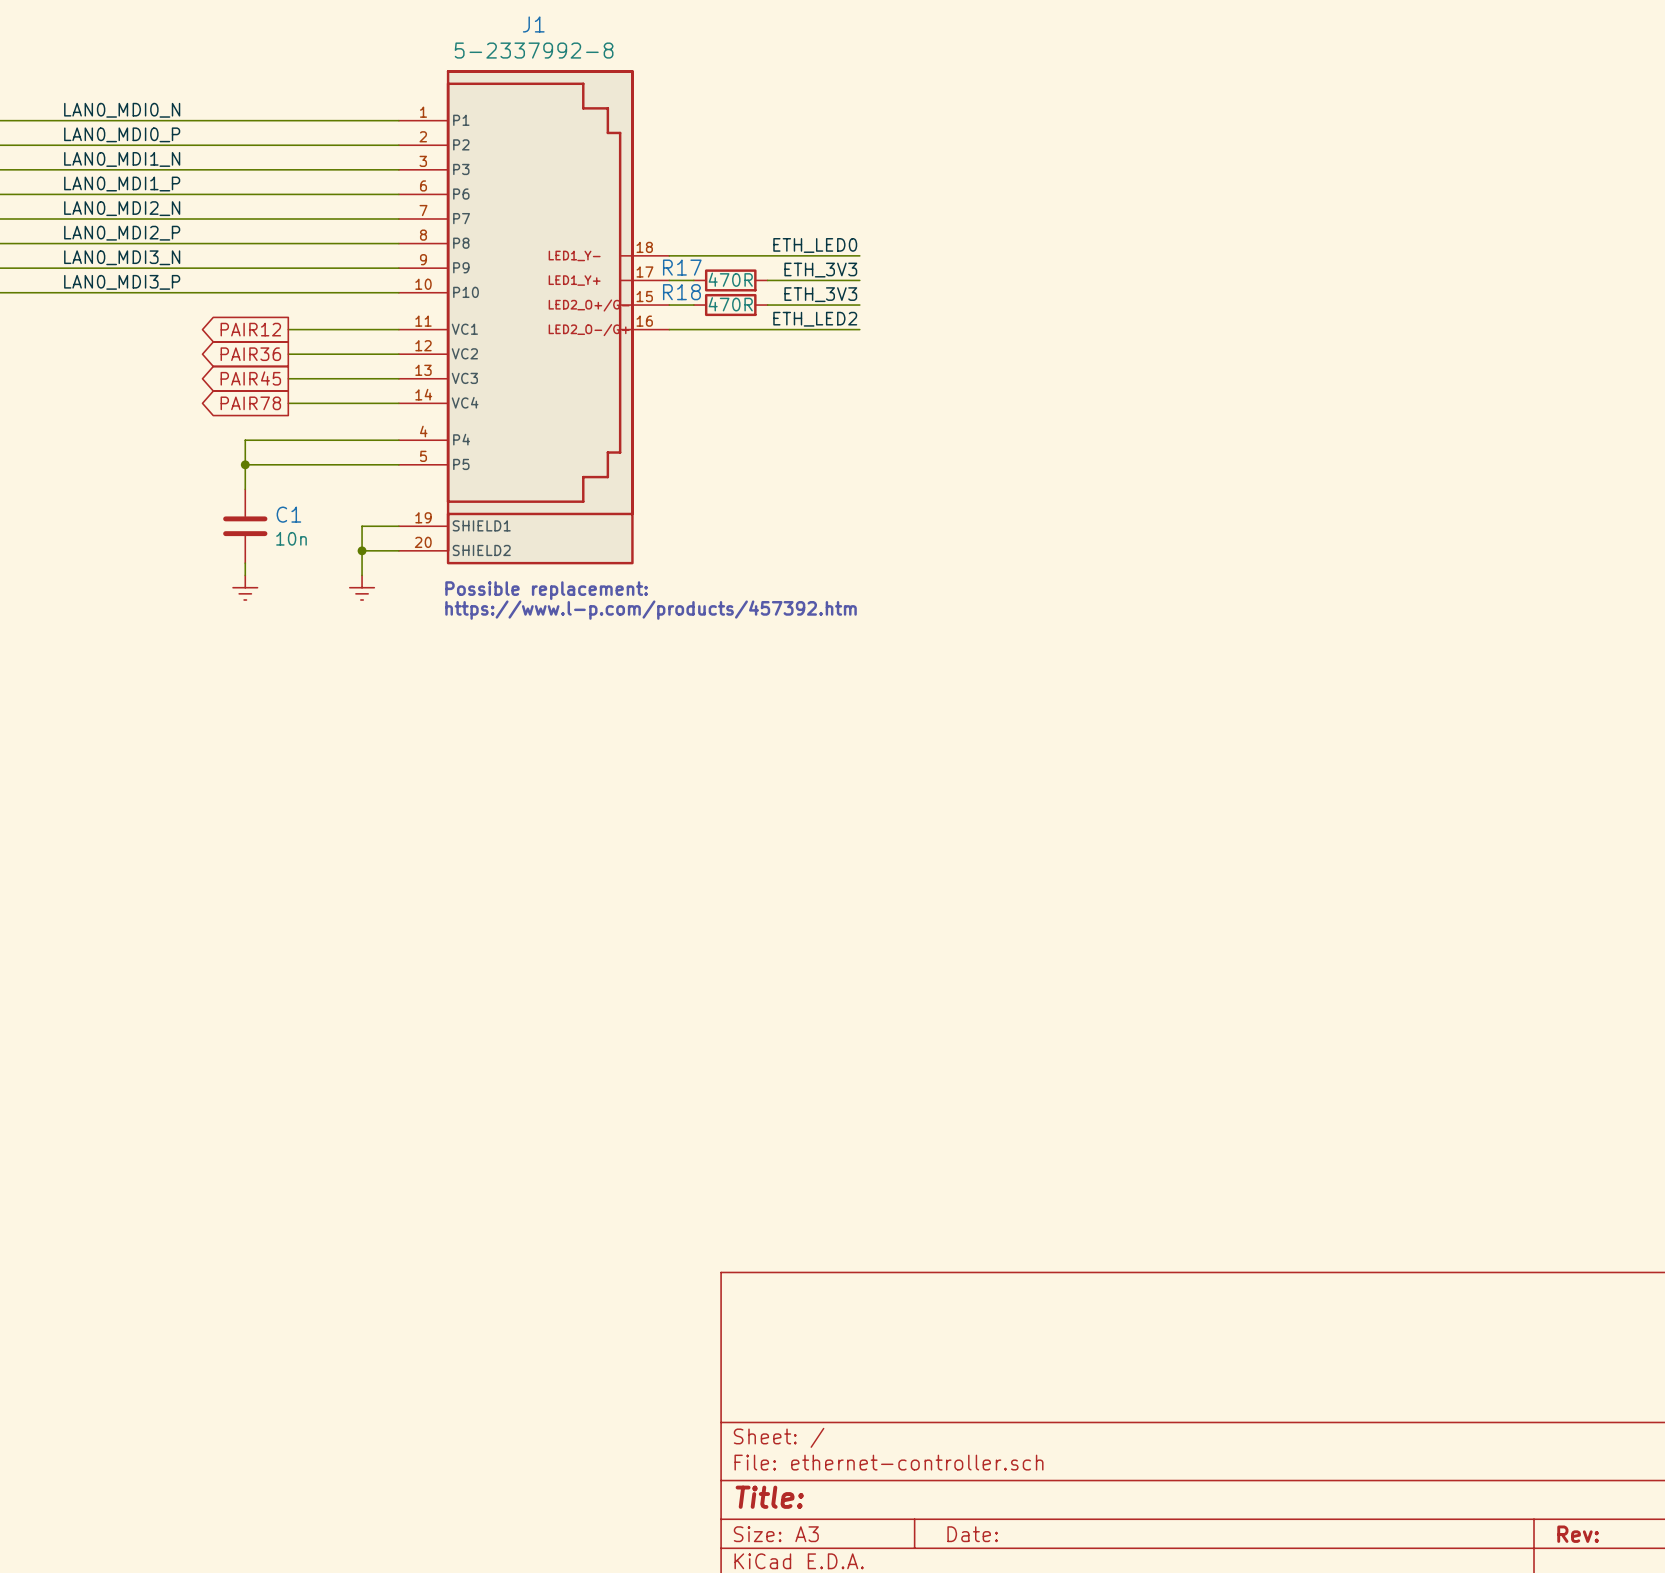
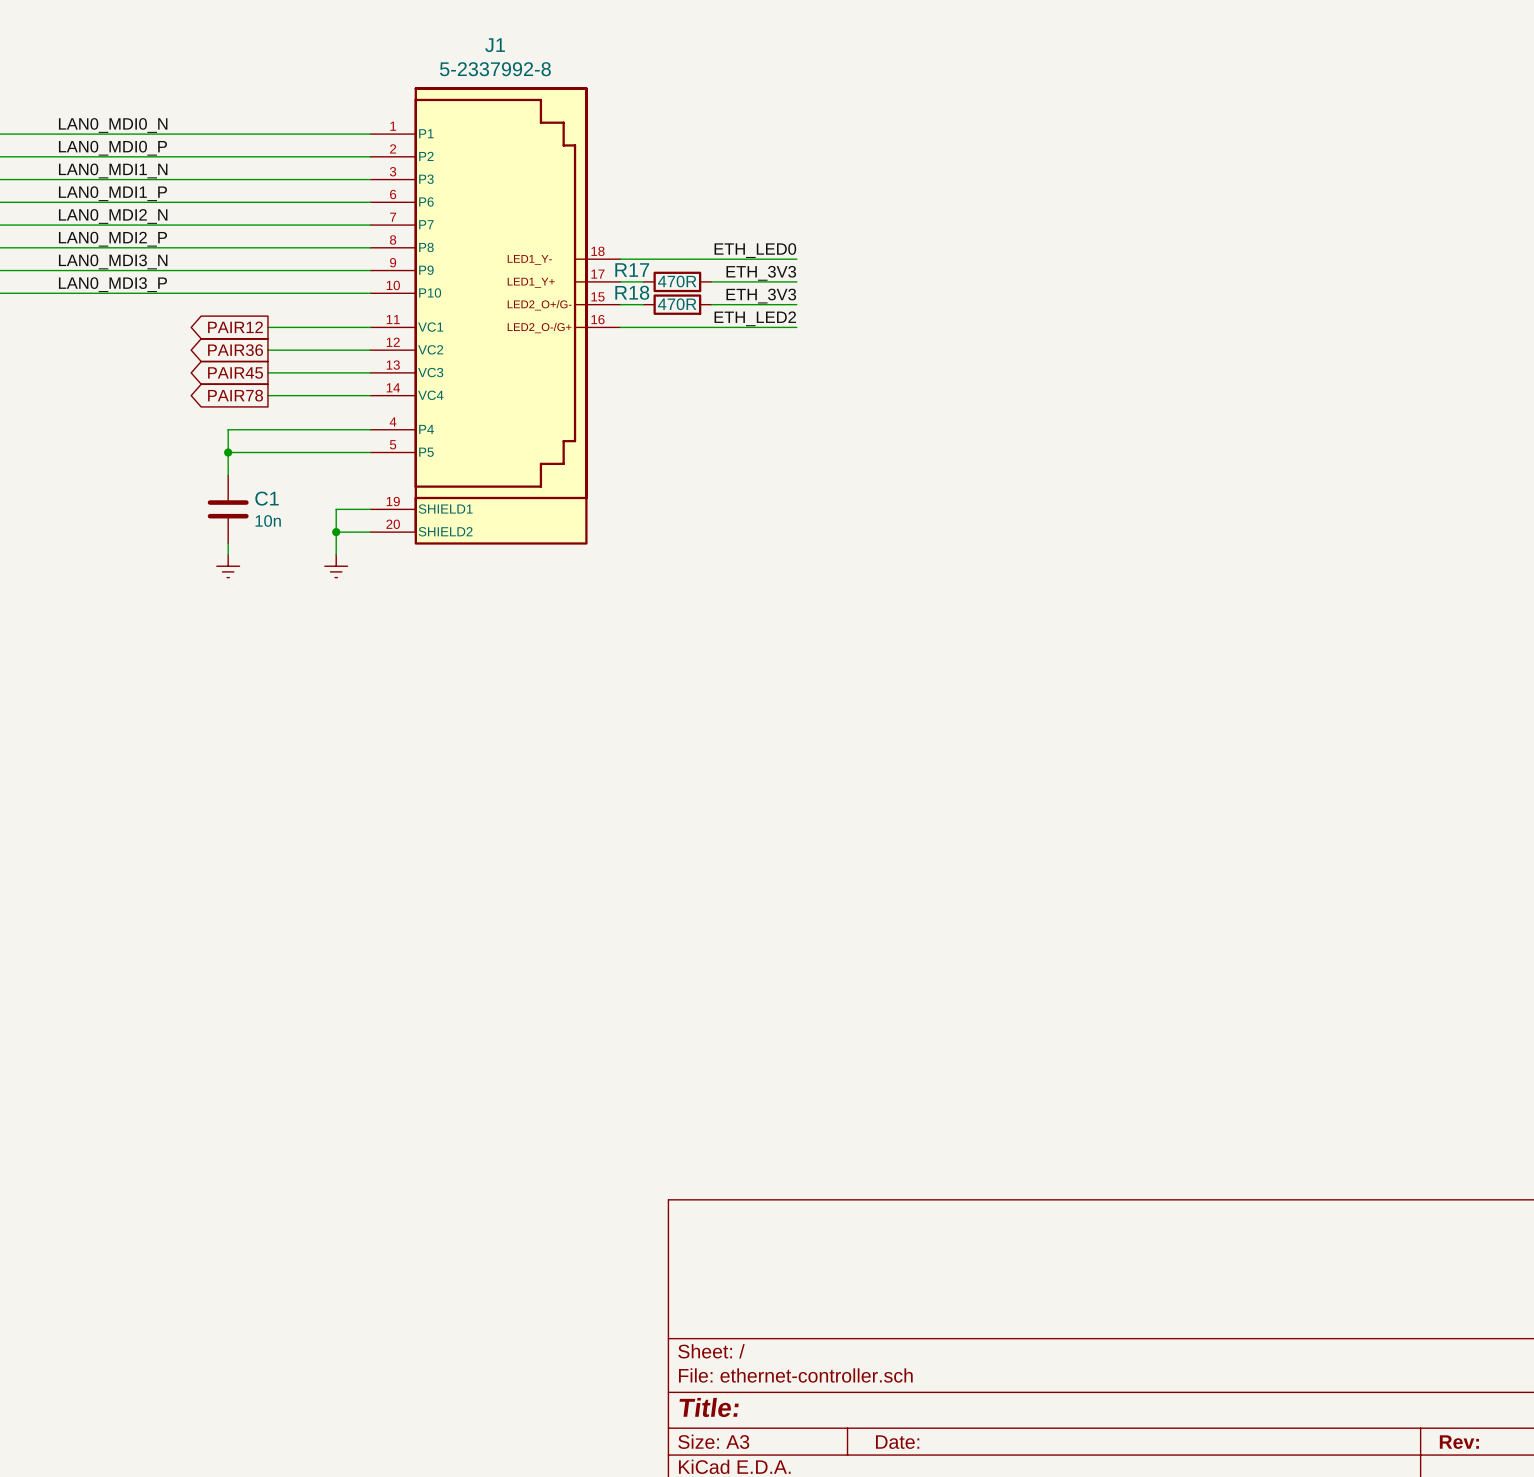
text: Possible replacement: (546, 590) -> none
text: https://www.l-p.com/products/457392.htm (651, 610) -> none

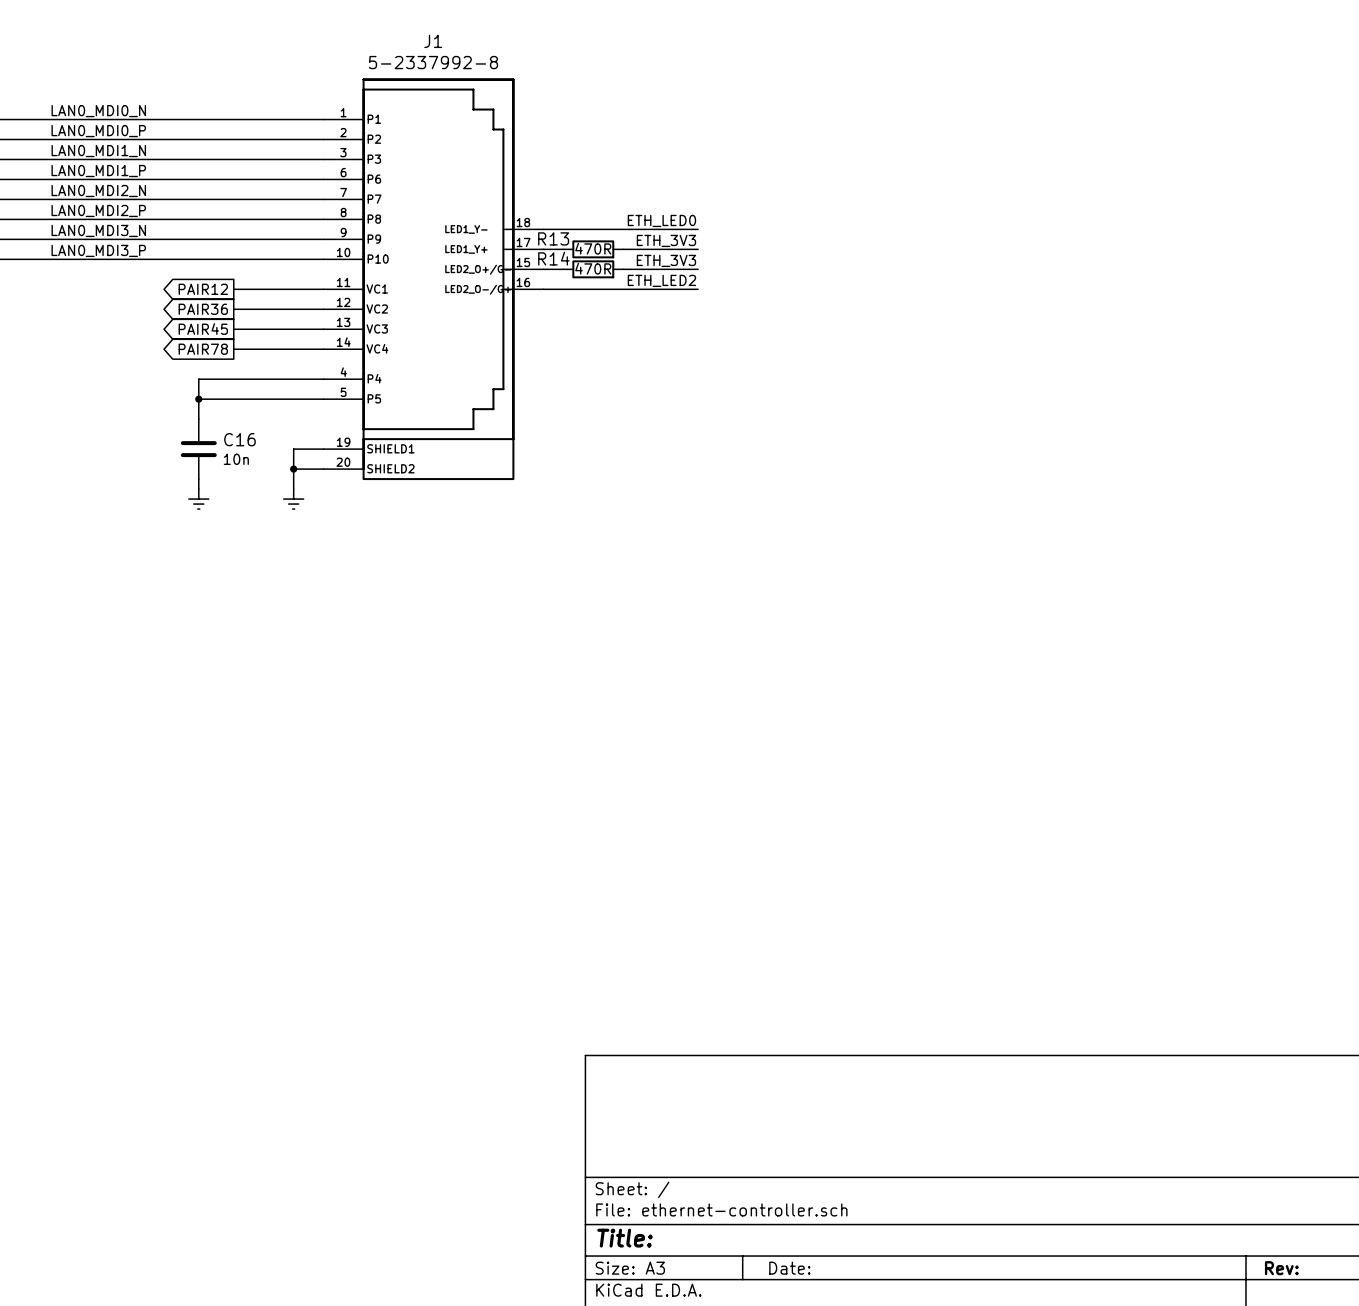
R17 name: R17 (632, 270) -> R13 (553, 238)
R18 name: R18 (632, 292) -> R14 (553, 258)
C1 name: C1 (267, 498) -> C16 (239, 439)

